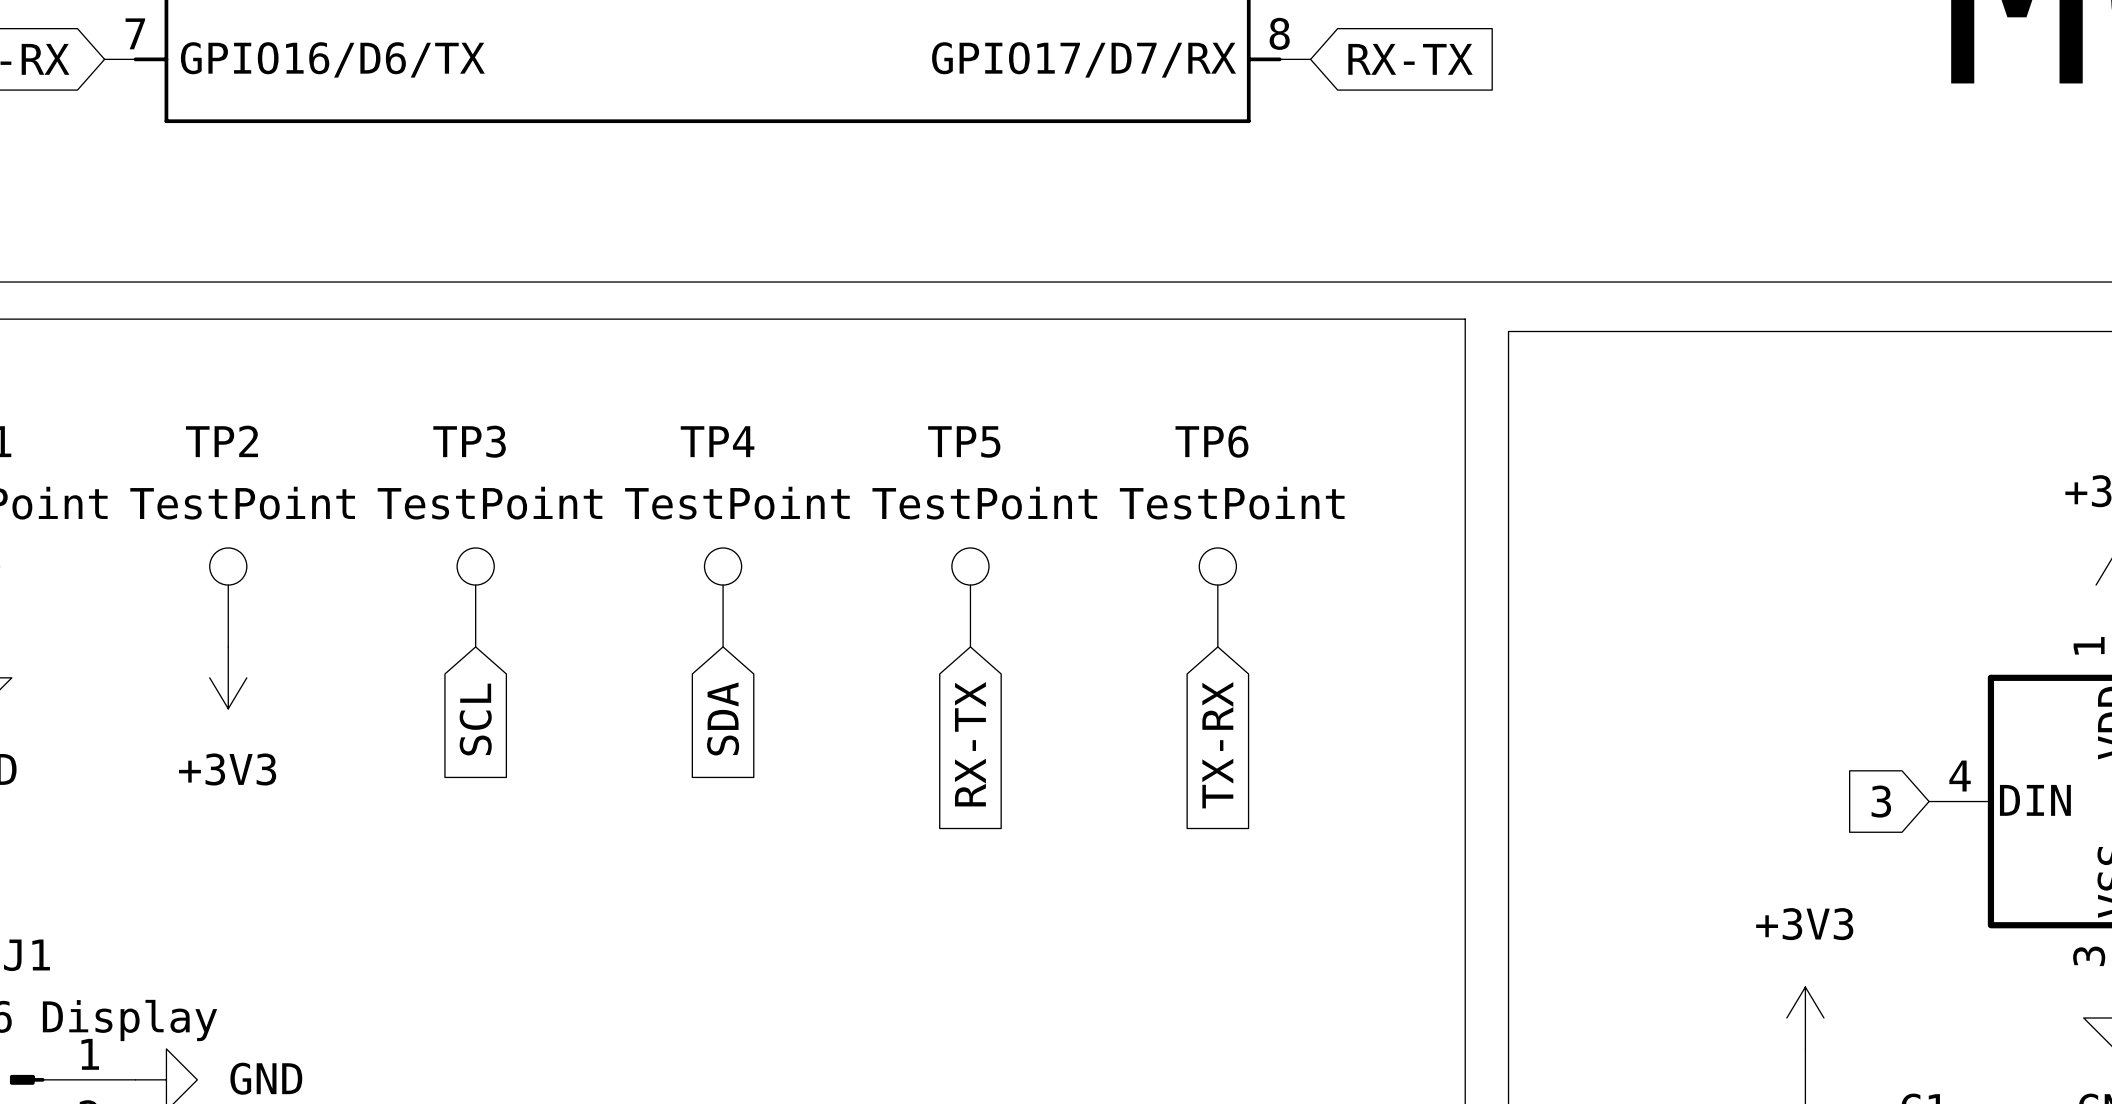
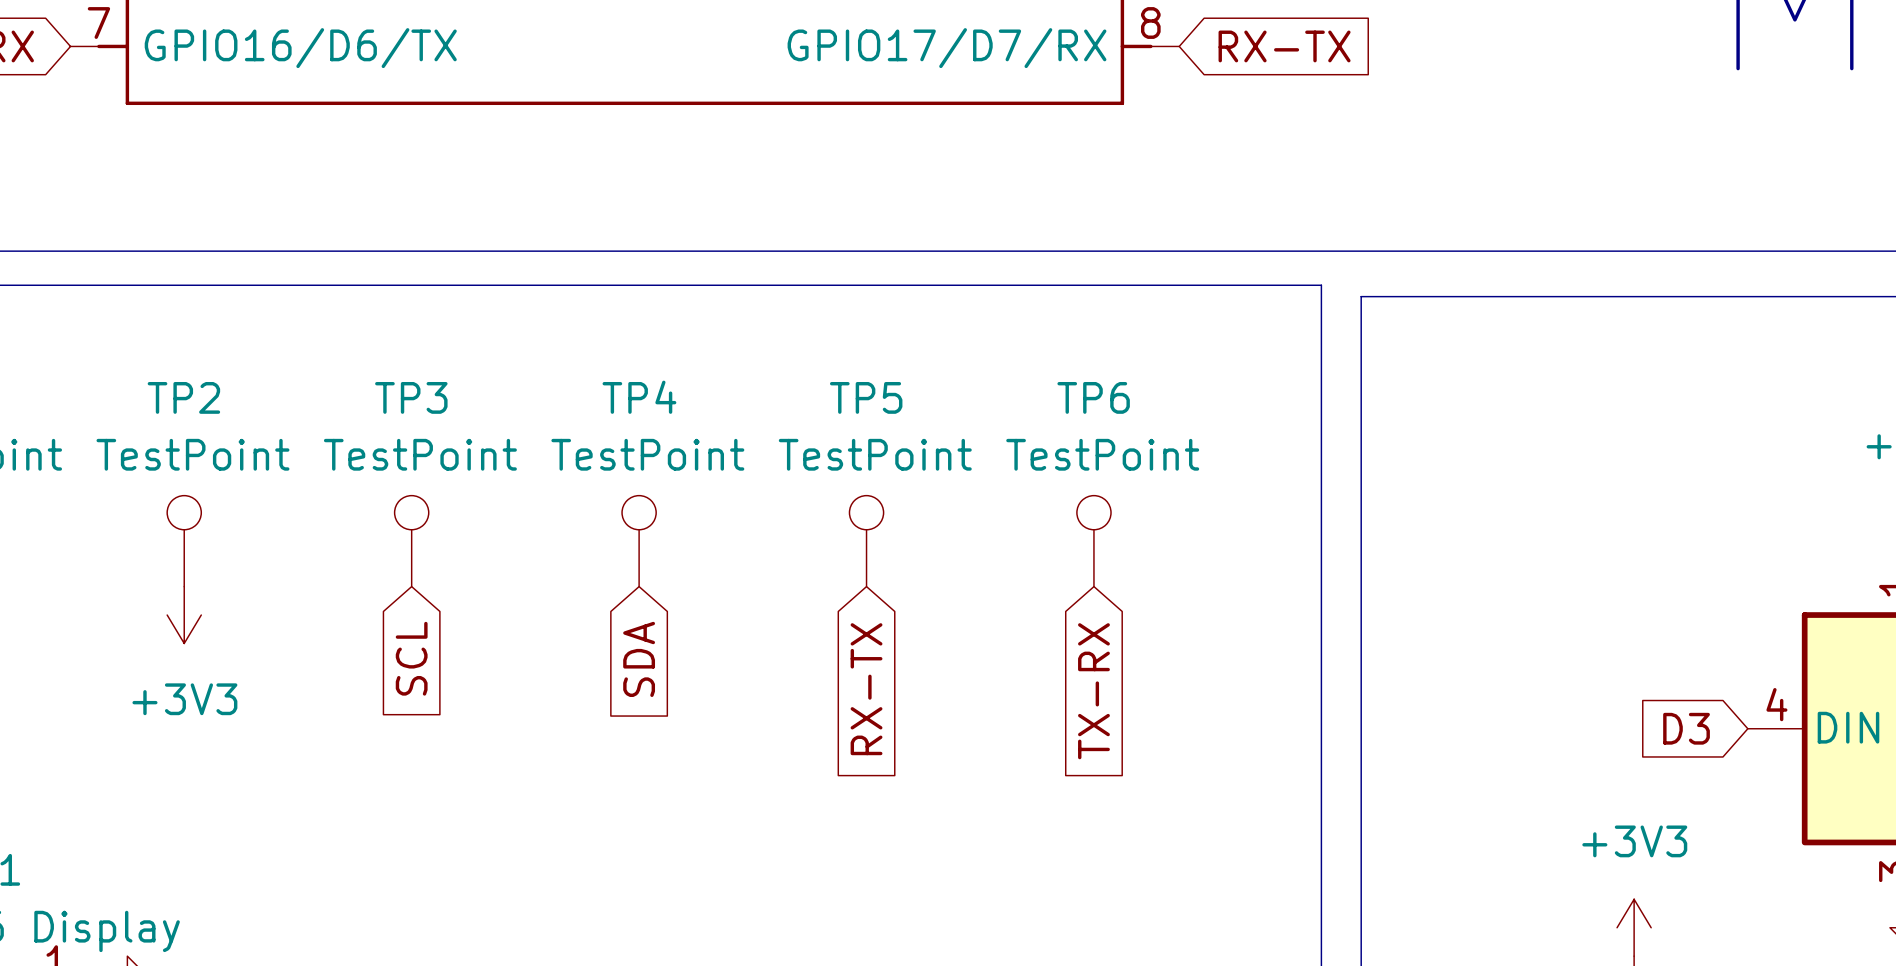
global label: 3 (1881, 801) -> D3 (1686, 728)

